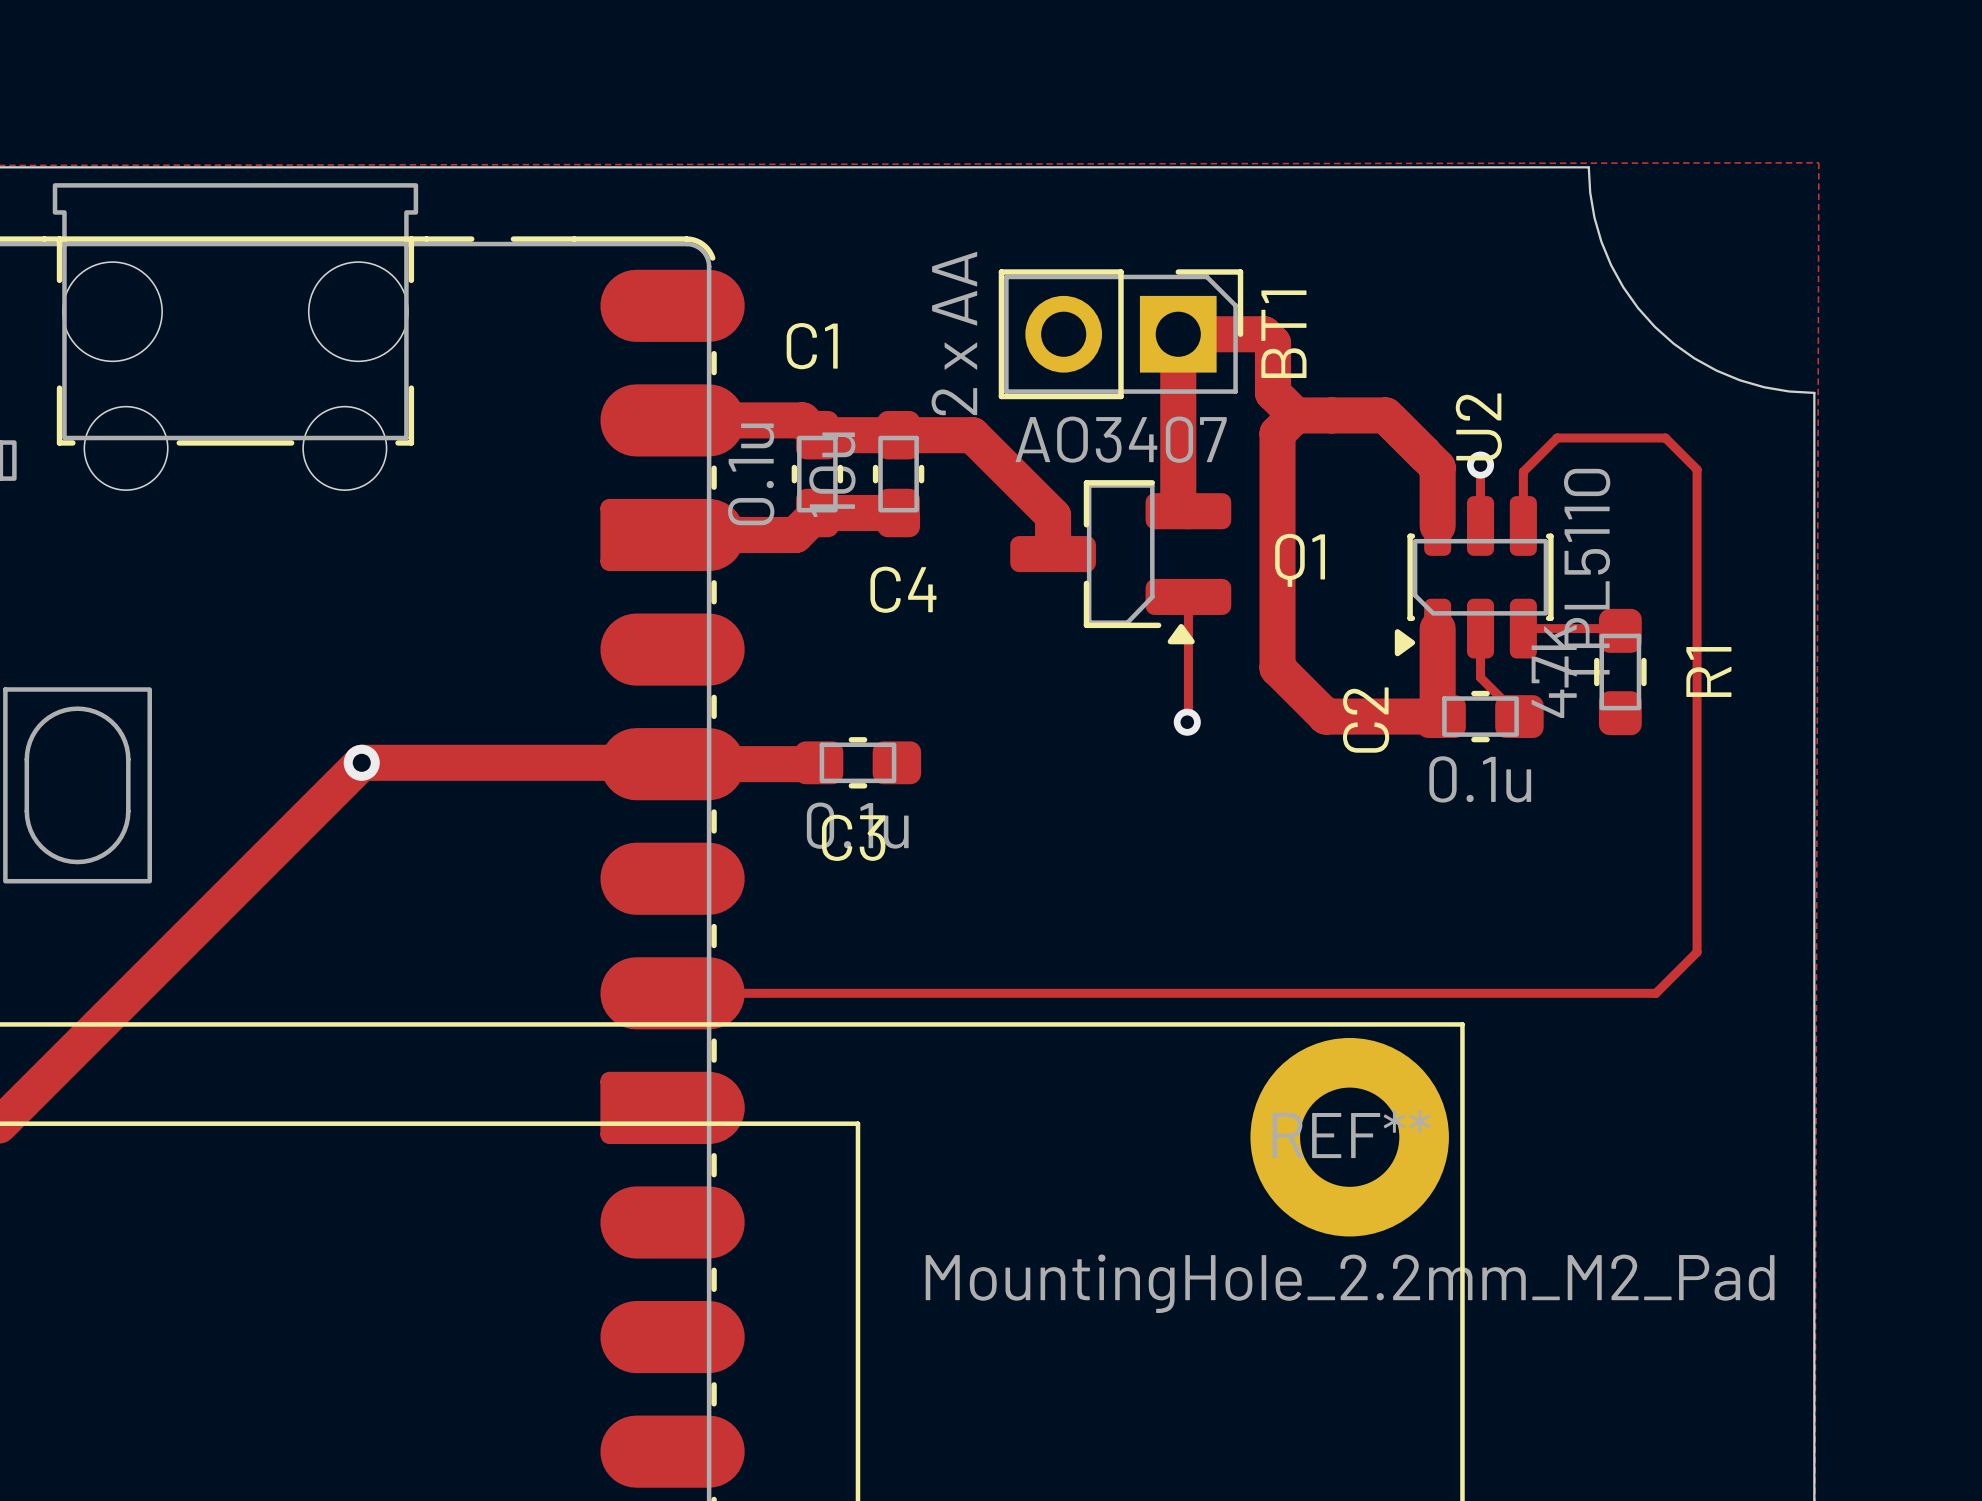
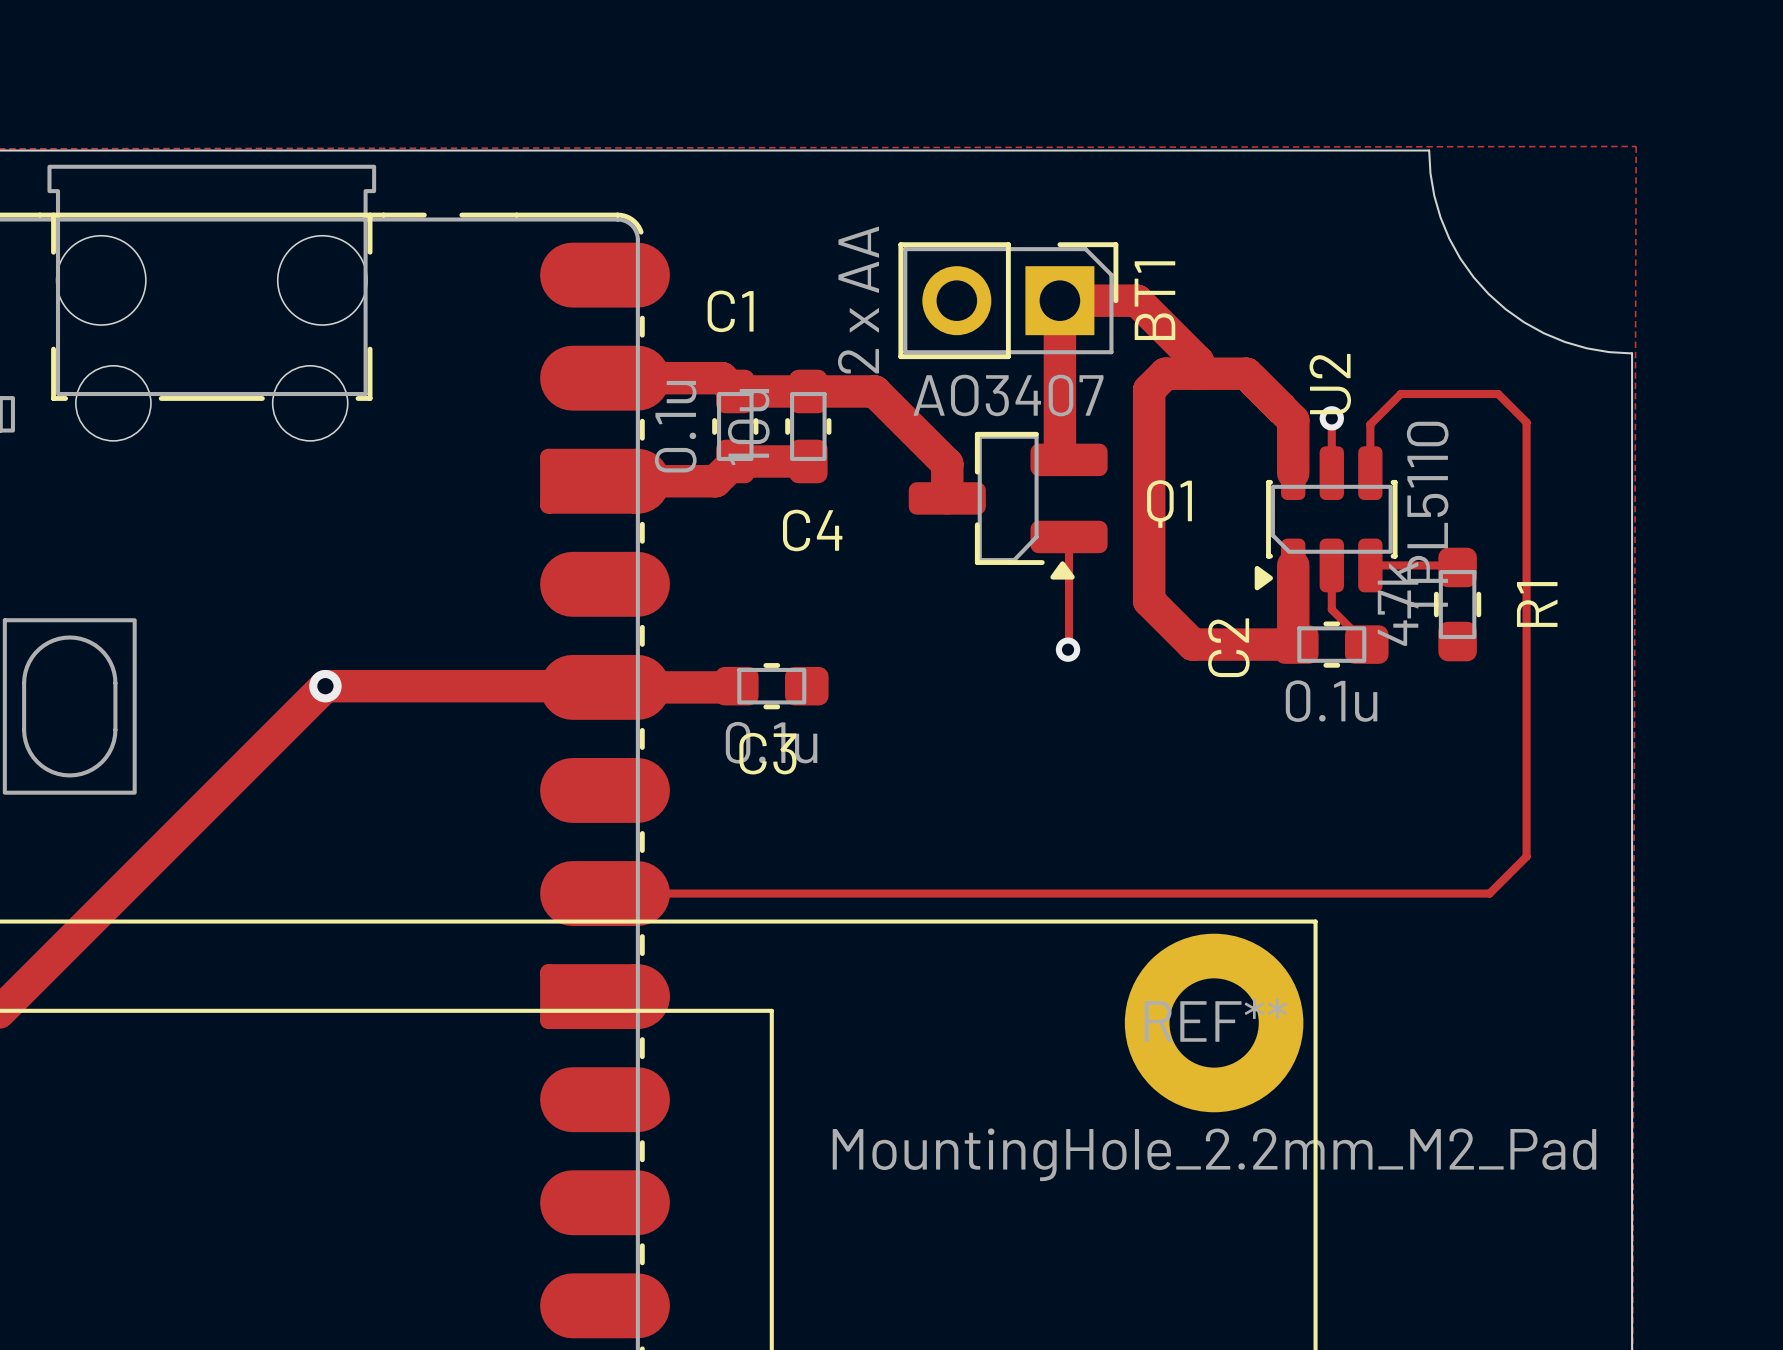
track: (1273, 343) (1273, 392) (1295, 415) -> (1145, 308) (1197, 361) (1197, 373)

